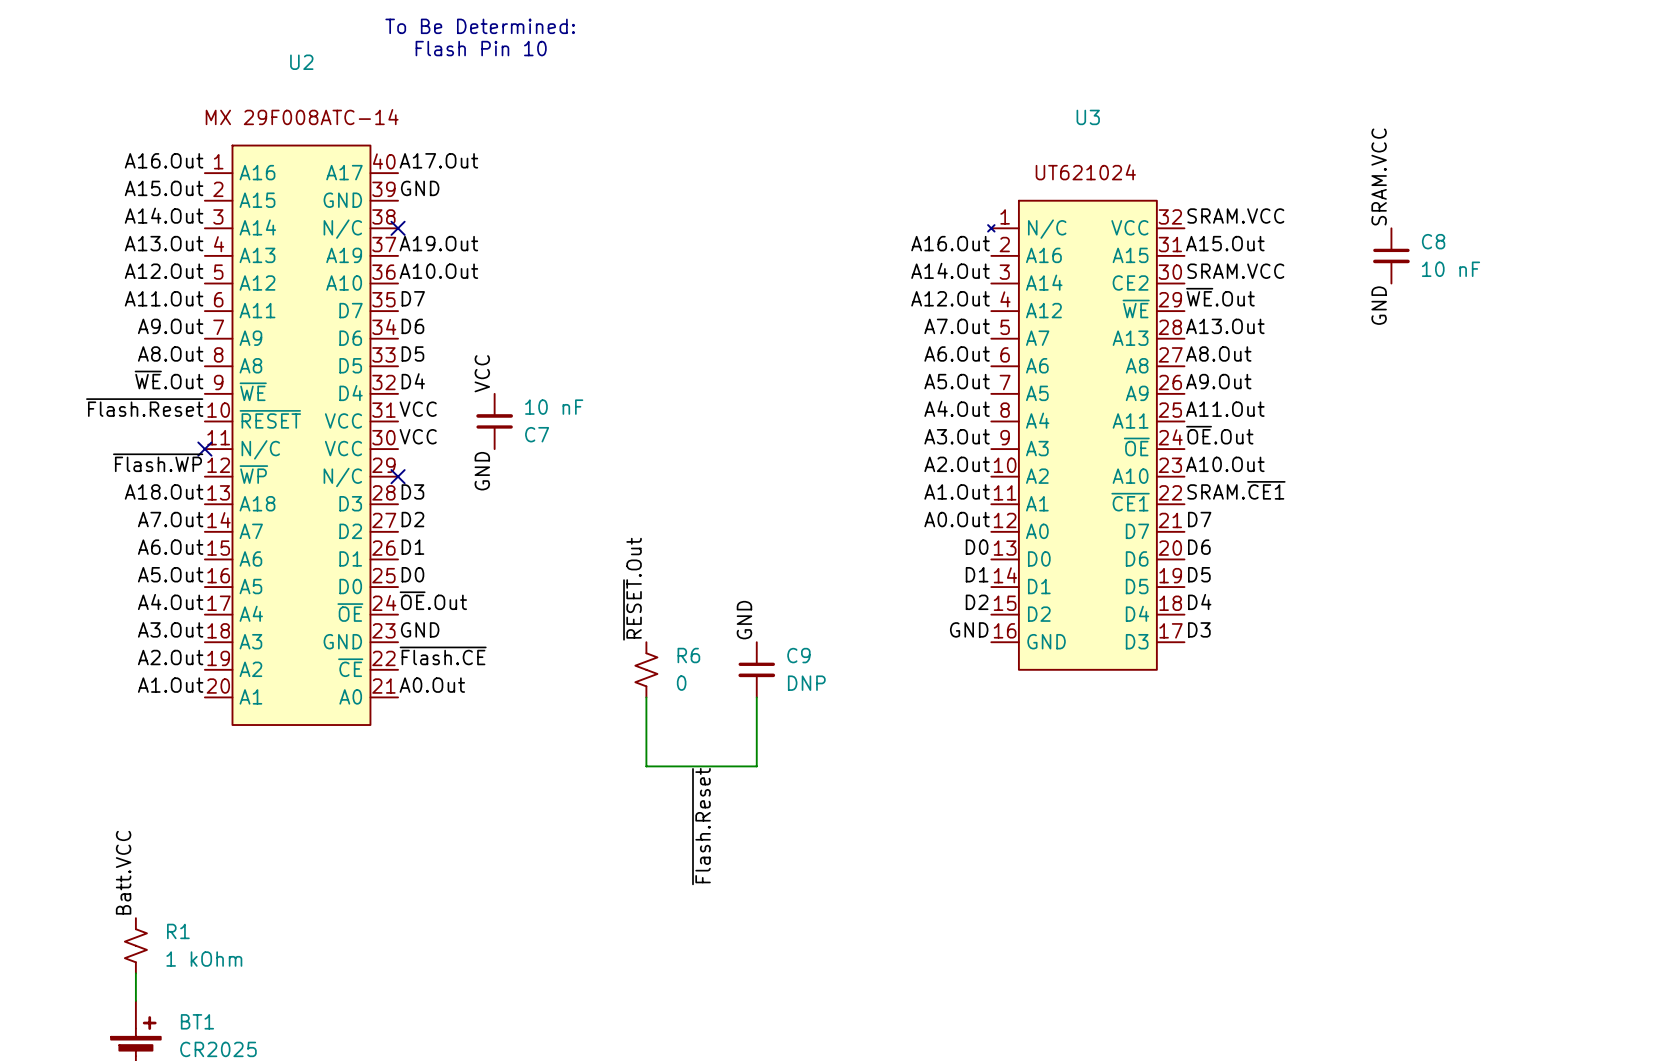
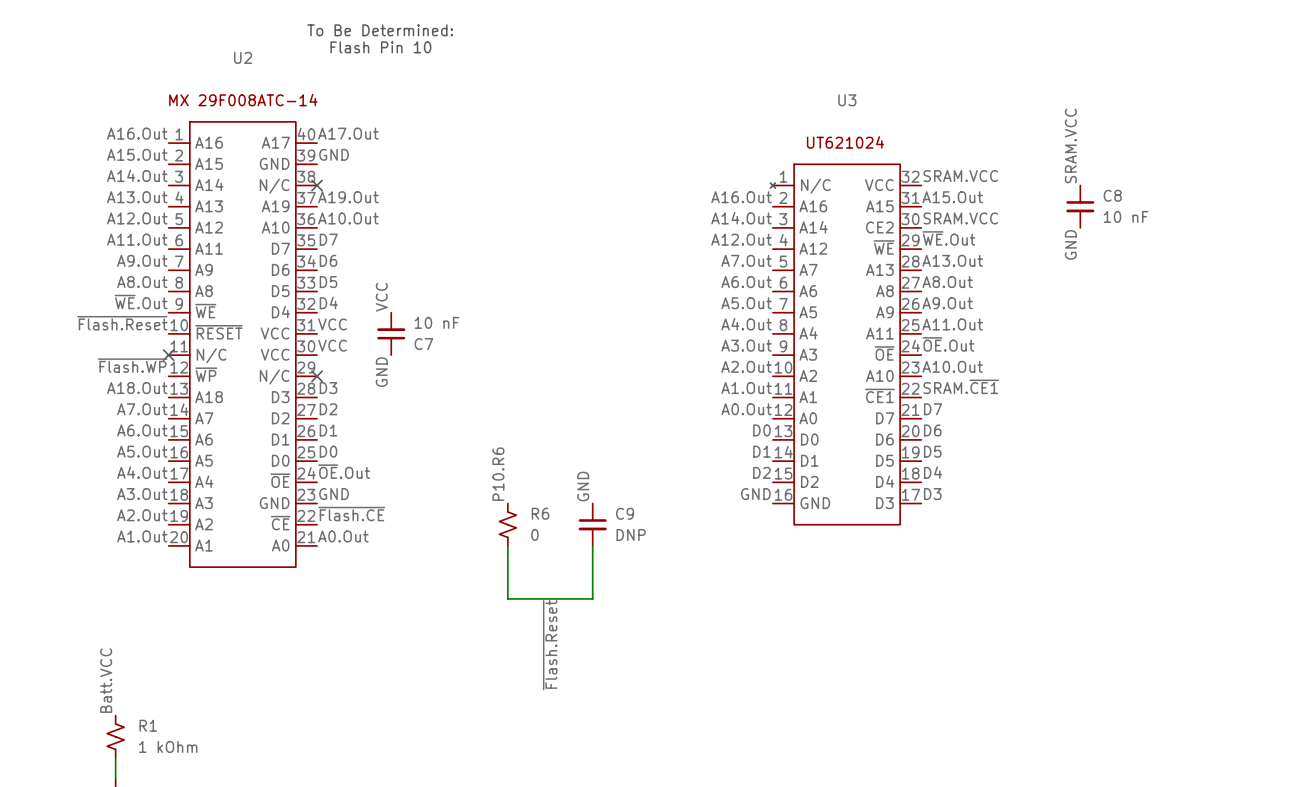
label: ~{RESET}.Out (632, 589) -> P10.R6 (498, 474)

